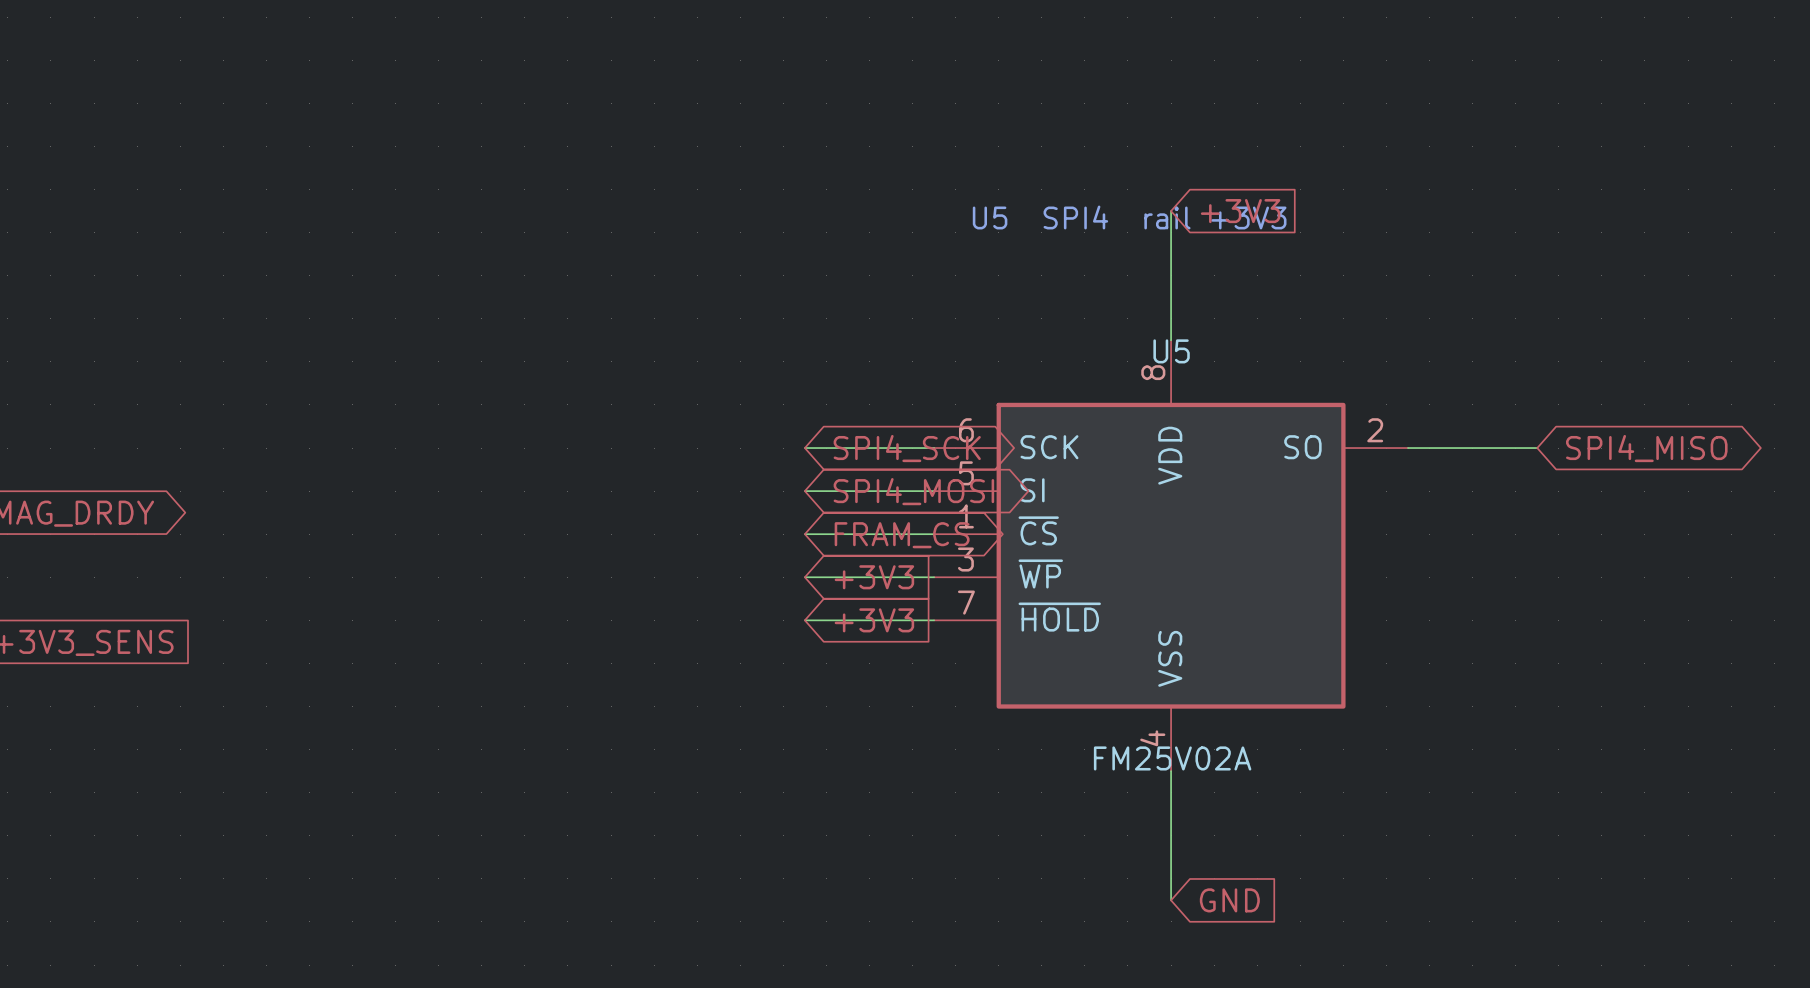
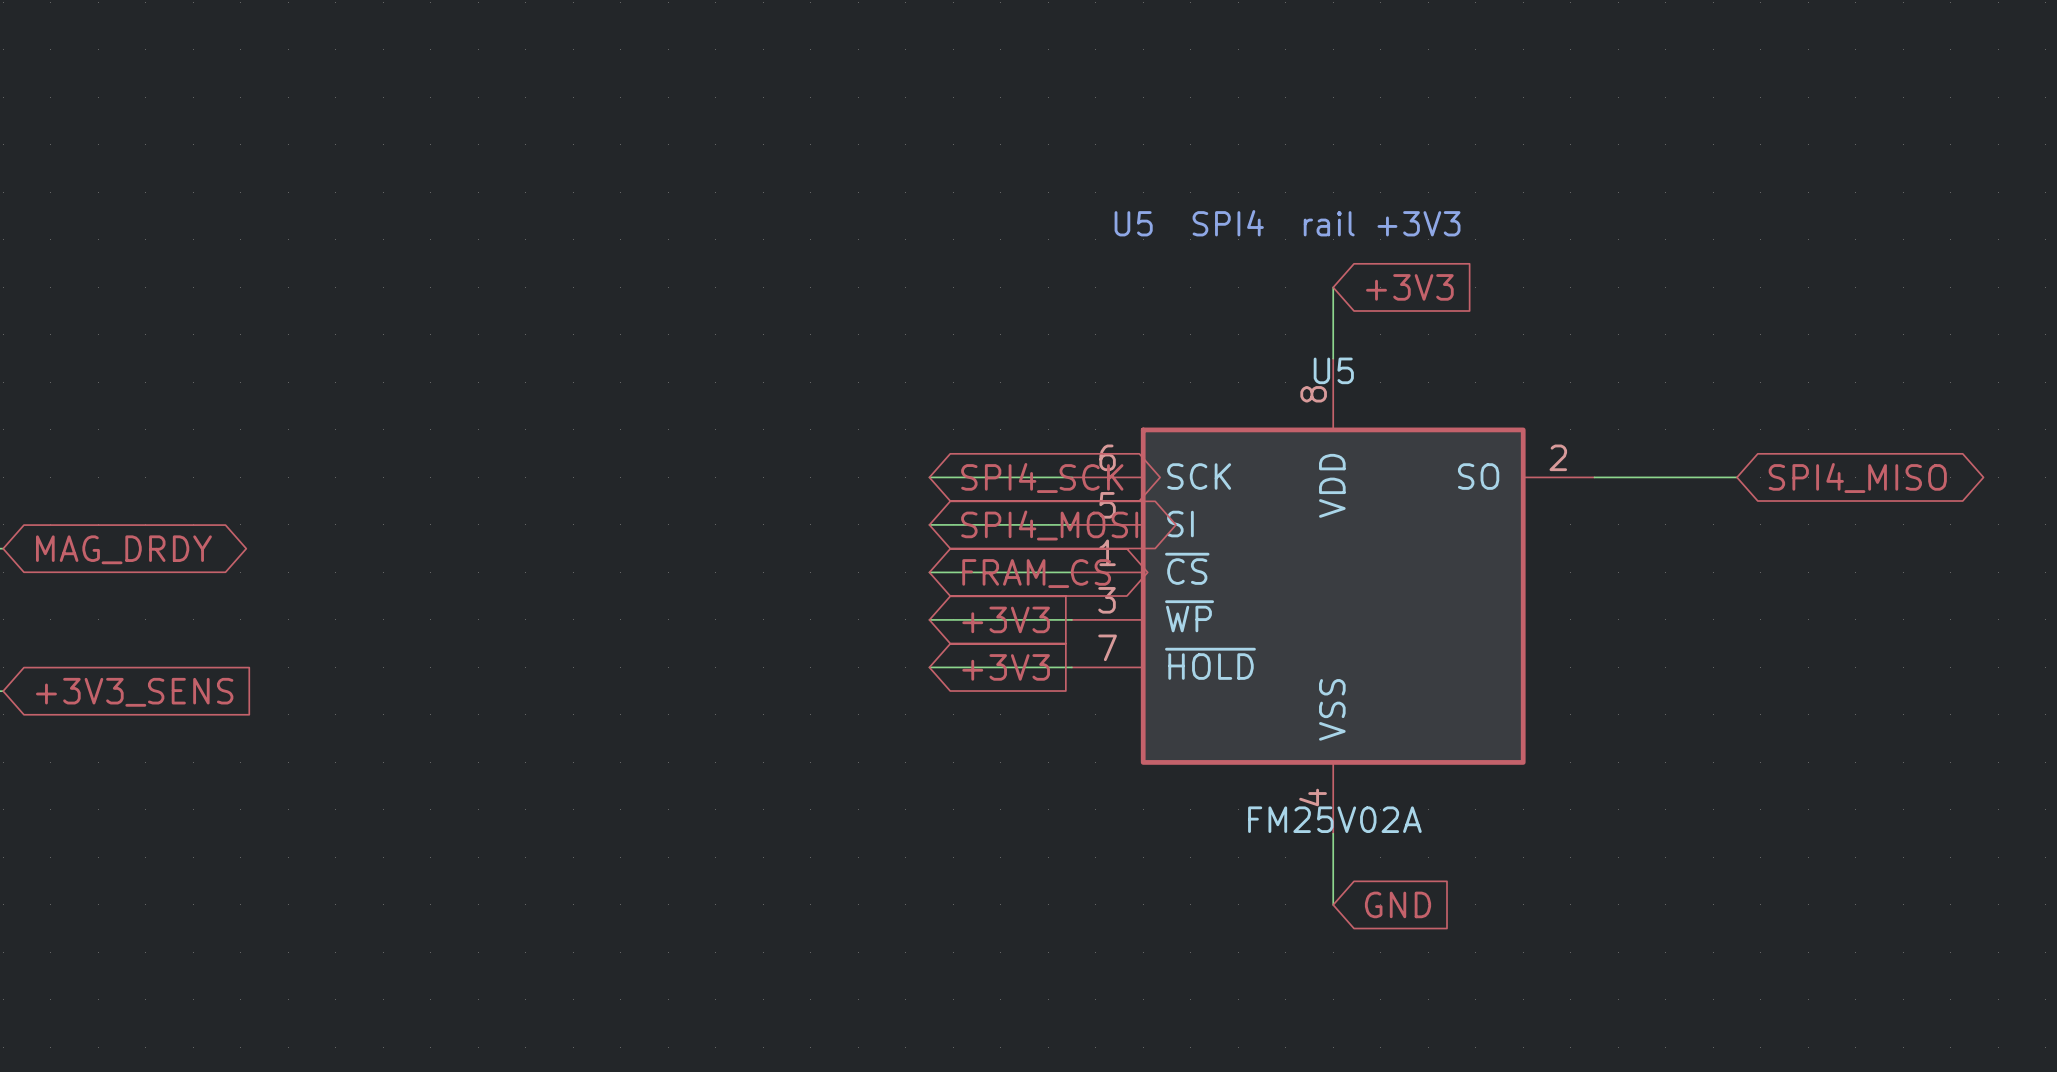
wire: (1171, 211) (1171, 275) -> none
global label position: +3V3 (1240, 211) -> +3V3 (1409, 287)
wire: (1171, 835) (1171, 900) -> none
global label position: GND (1229, 900) -> GND (1398, 904)

